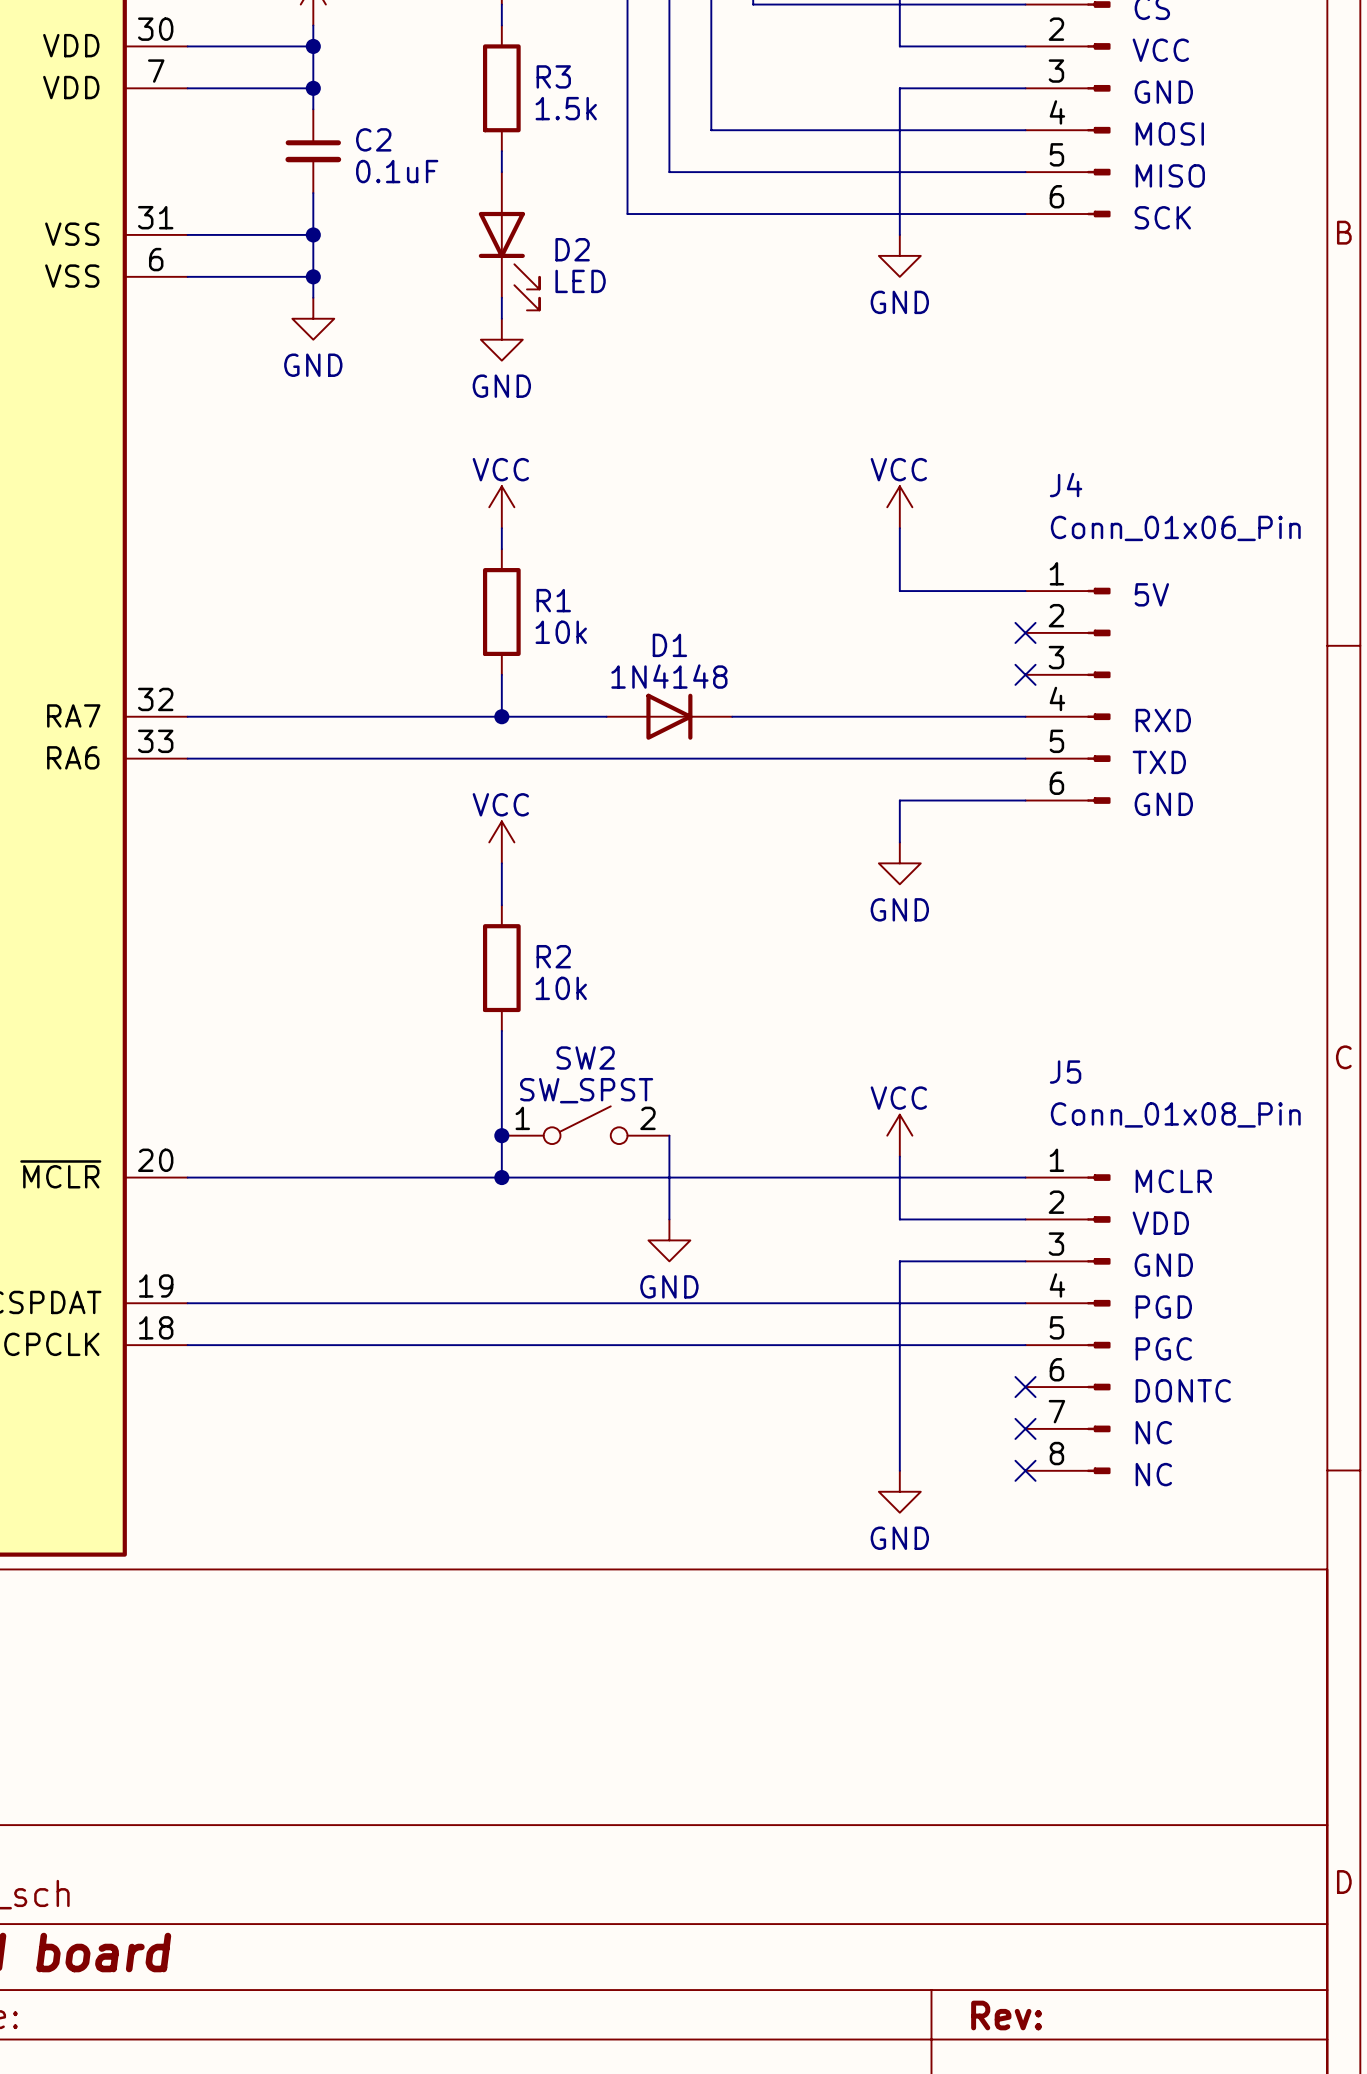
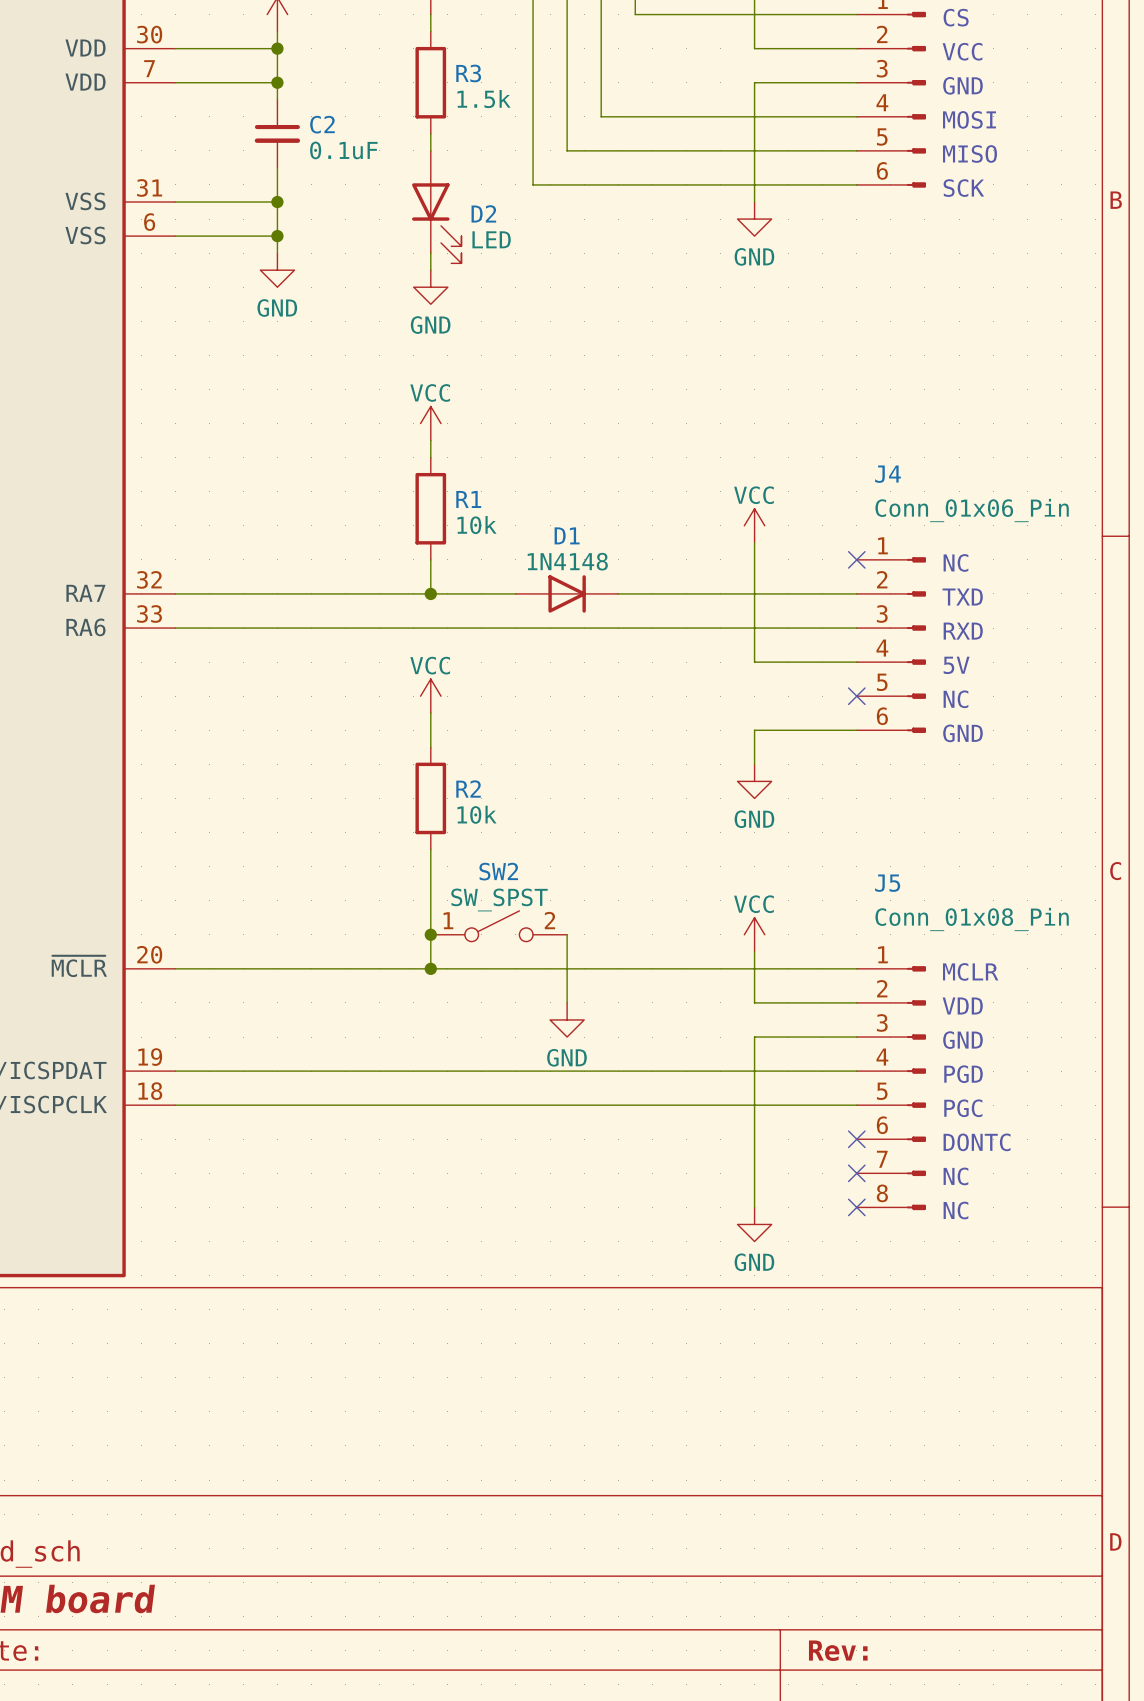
power symbol position: VCC (899, 507) -> VCC (754, 525)
wire: (899, 528) (899, 591) (1025, 591) -> none
text: 5V (1151, 594) -> none
no-connect mark: (1025, 632) -> none
text: none -> NC (955, 562)
J4 position: (1068, 695) -> (891, 645)
text: RXD (1163, 720) -> TXD (962, 597)
text: TXD (1159, 762) -> RXD (963, 631)
wire: (899, 800) (899, 842) -> (754, 662) (754, 542)
text: GND (1163, 804) -> 5V (956, 665)
no-connect mark: none -> (856, 696)
text: none -> NC (955, 699)
power symbol position: GND (899, 863) -> GND (754, 781)
wire: none -> (856, 730) (754, 730) (754, 764)
text: none -> GND (962, 733)

